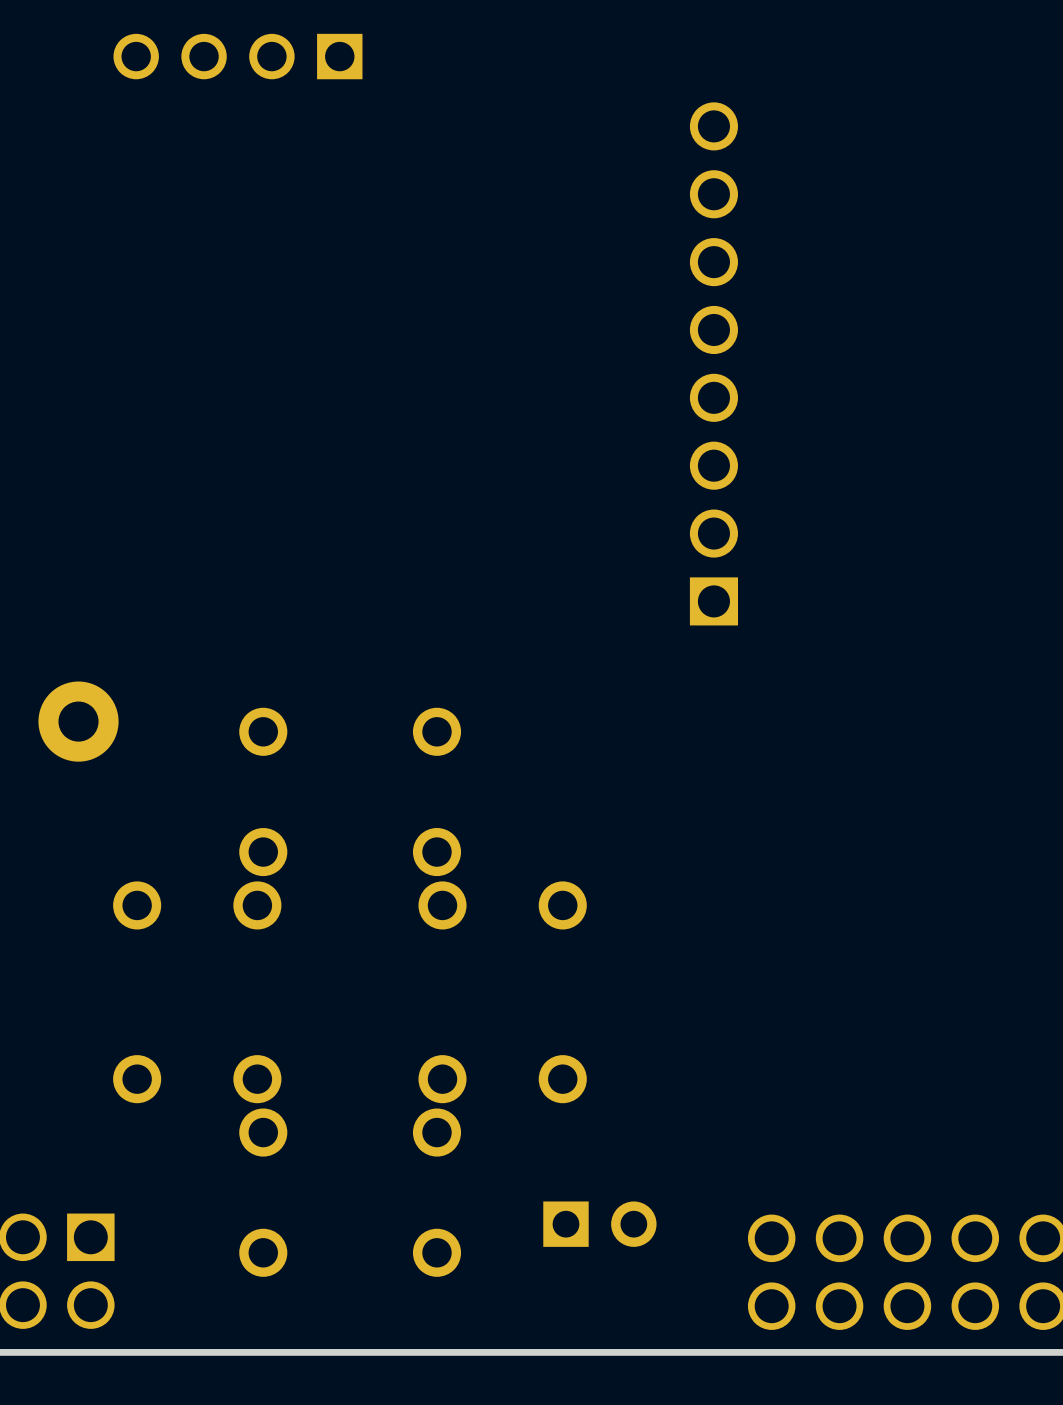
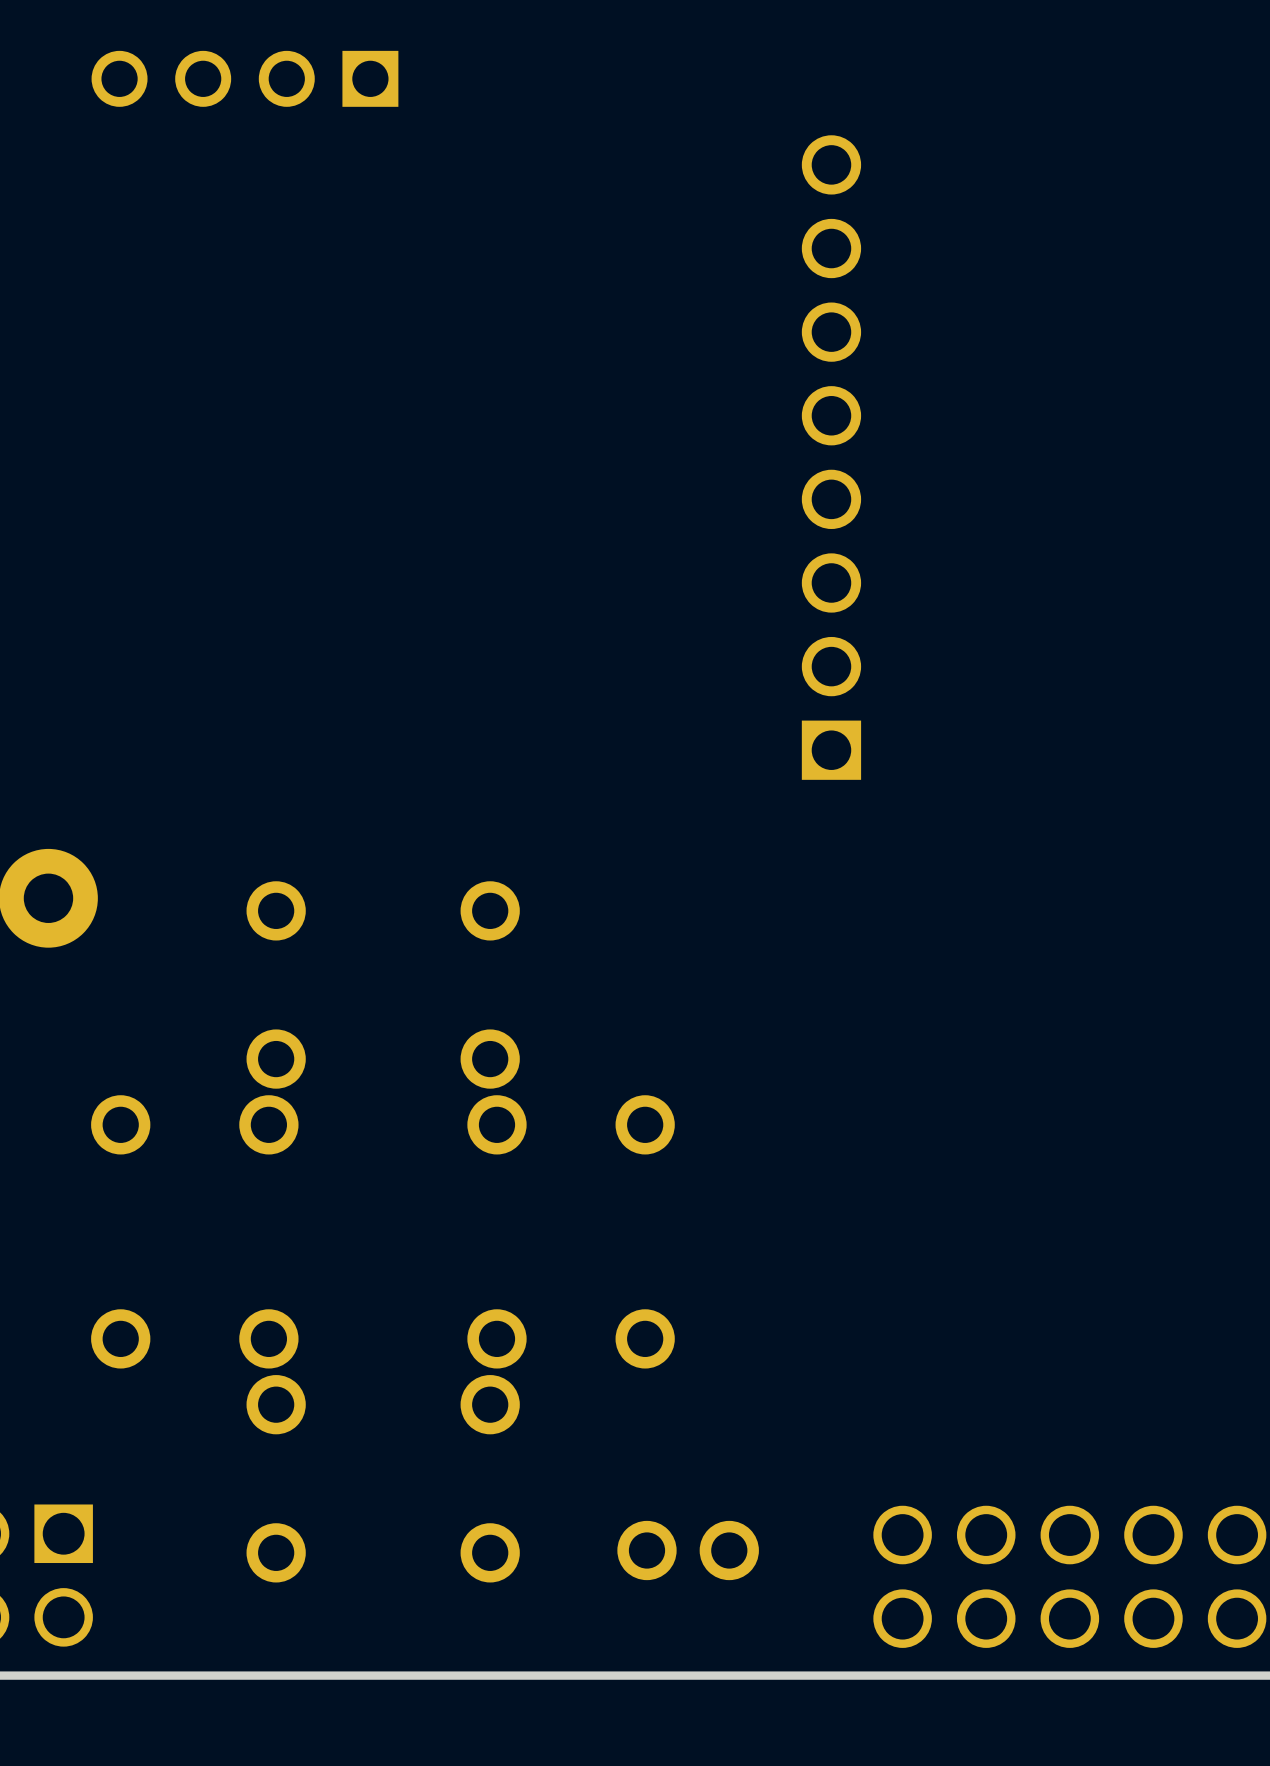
part: (599, 1224) -> none
part: none -> (688, 1550)

